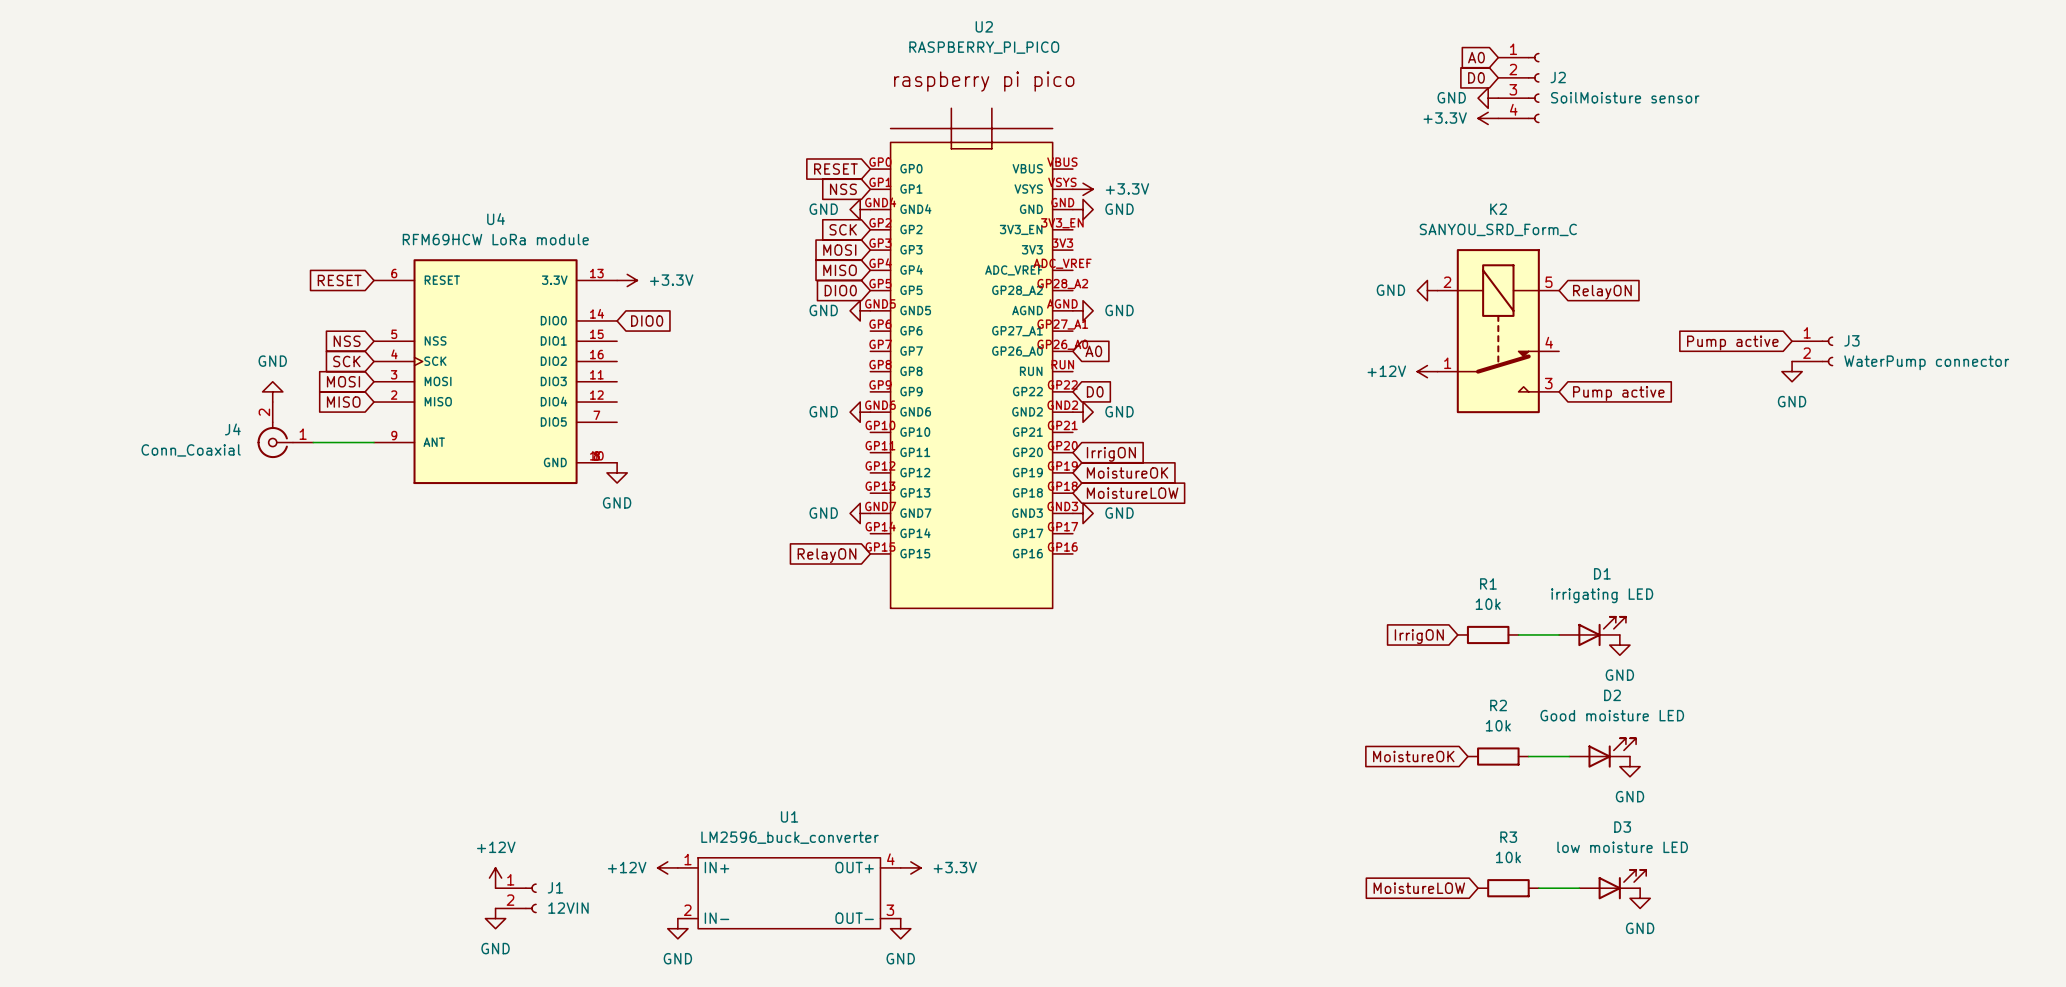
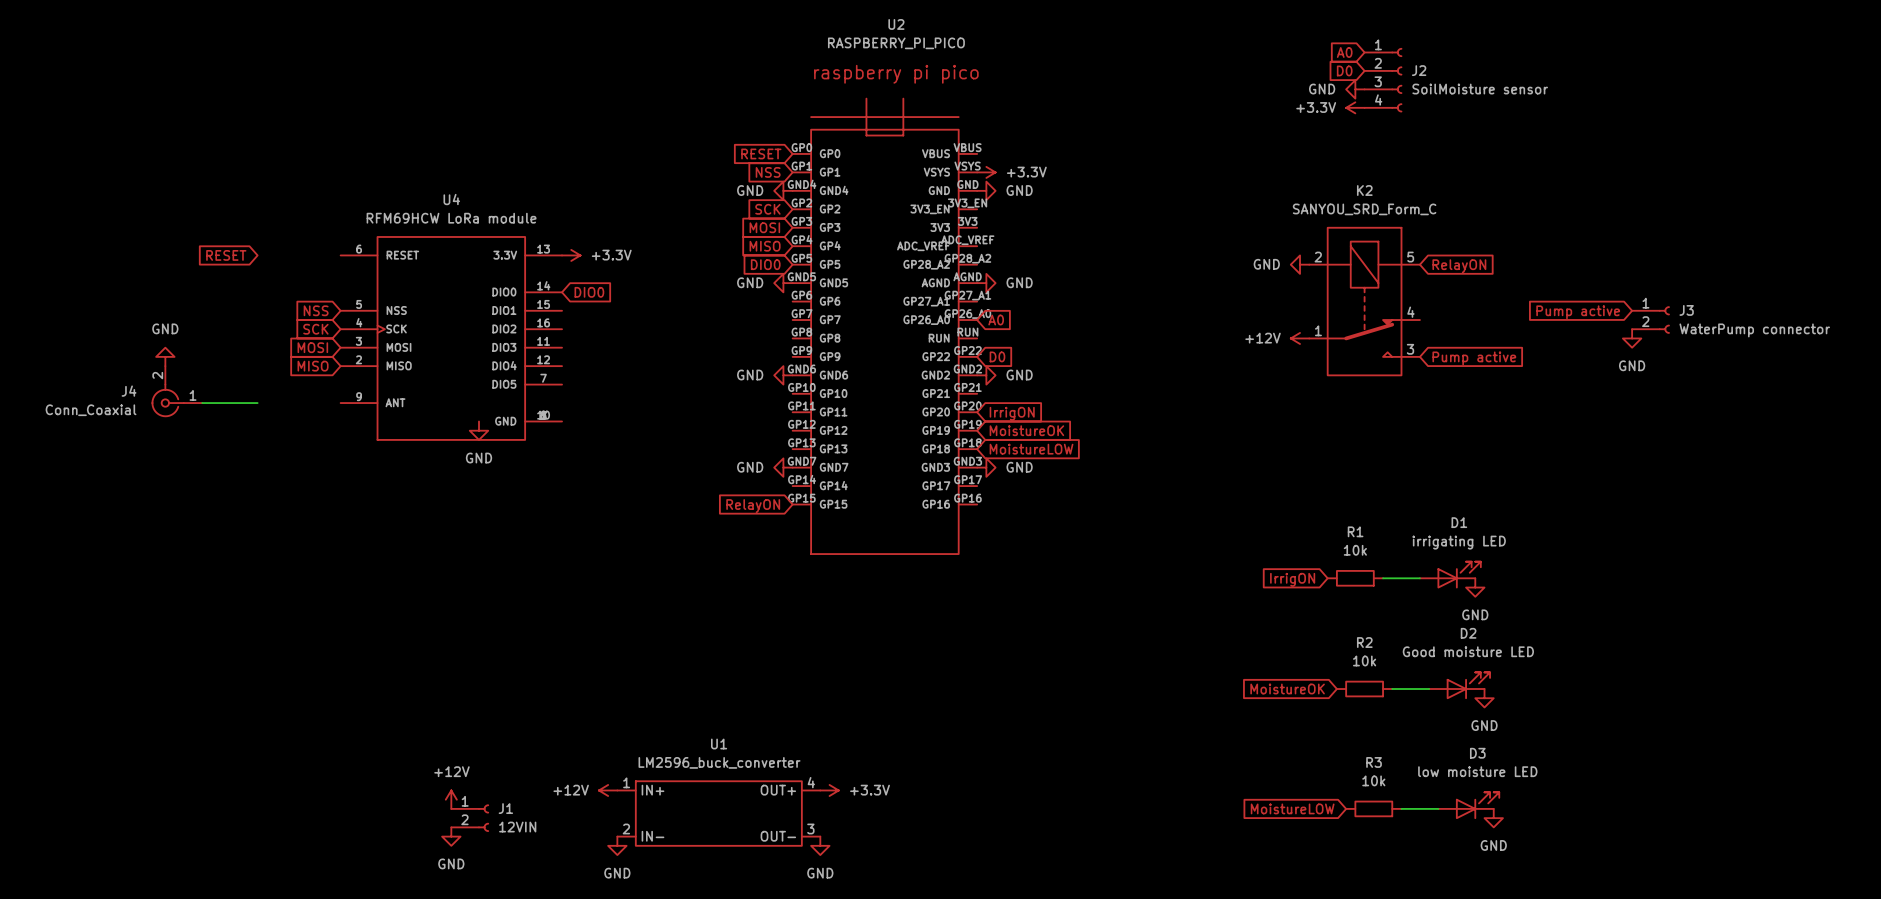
global label position: RESET (339, 280) -> RESET (226, 255)
power symbol position: GND (272, 391) -> GND (165, 356)
J4 position: (285, 430) -> (176, 391)
wire: (313, 442) (374, 442) -> (202, 403) (257, 403)
power symbol position: GND (617, 472) -> GND (479, 430)

